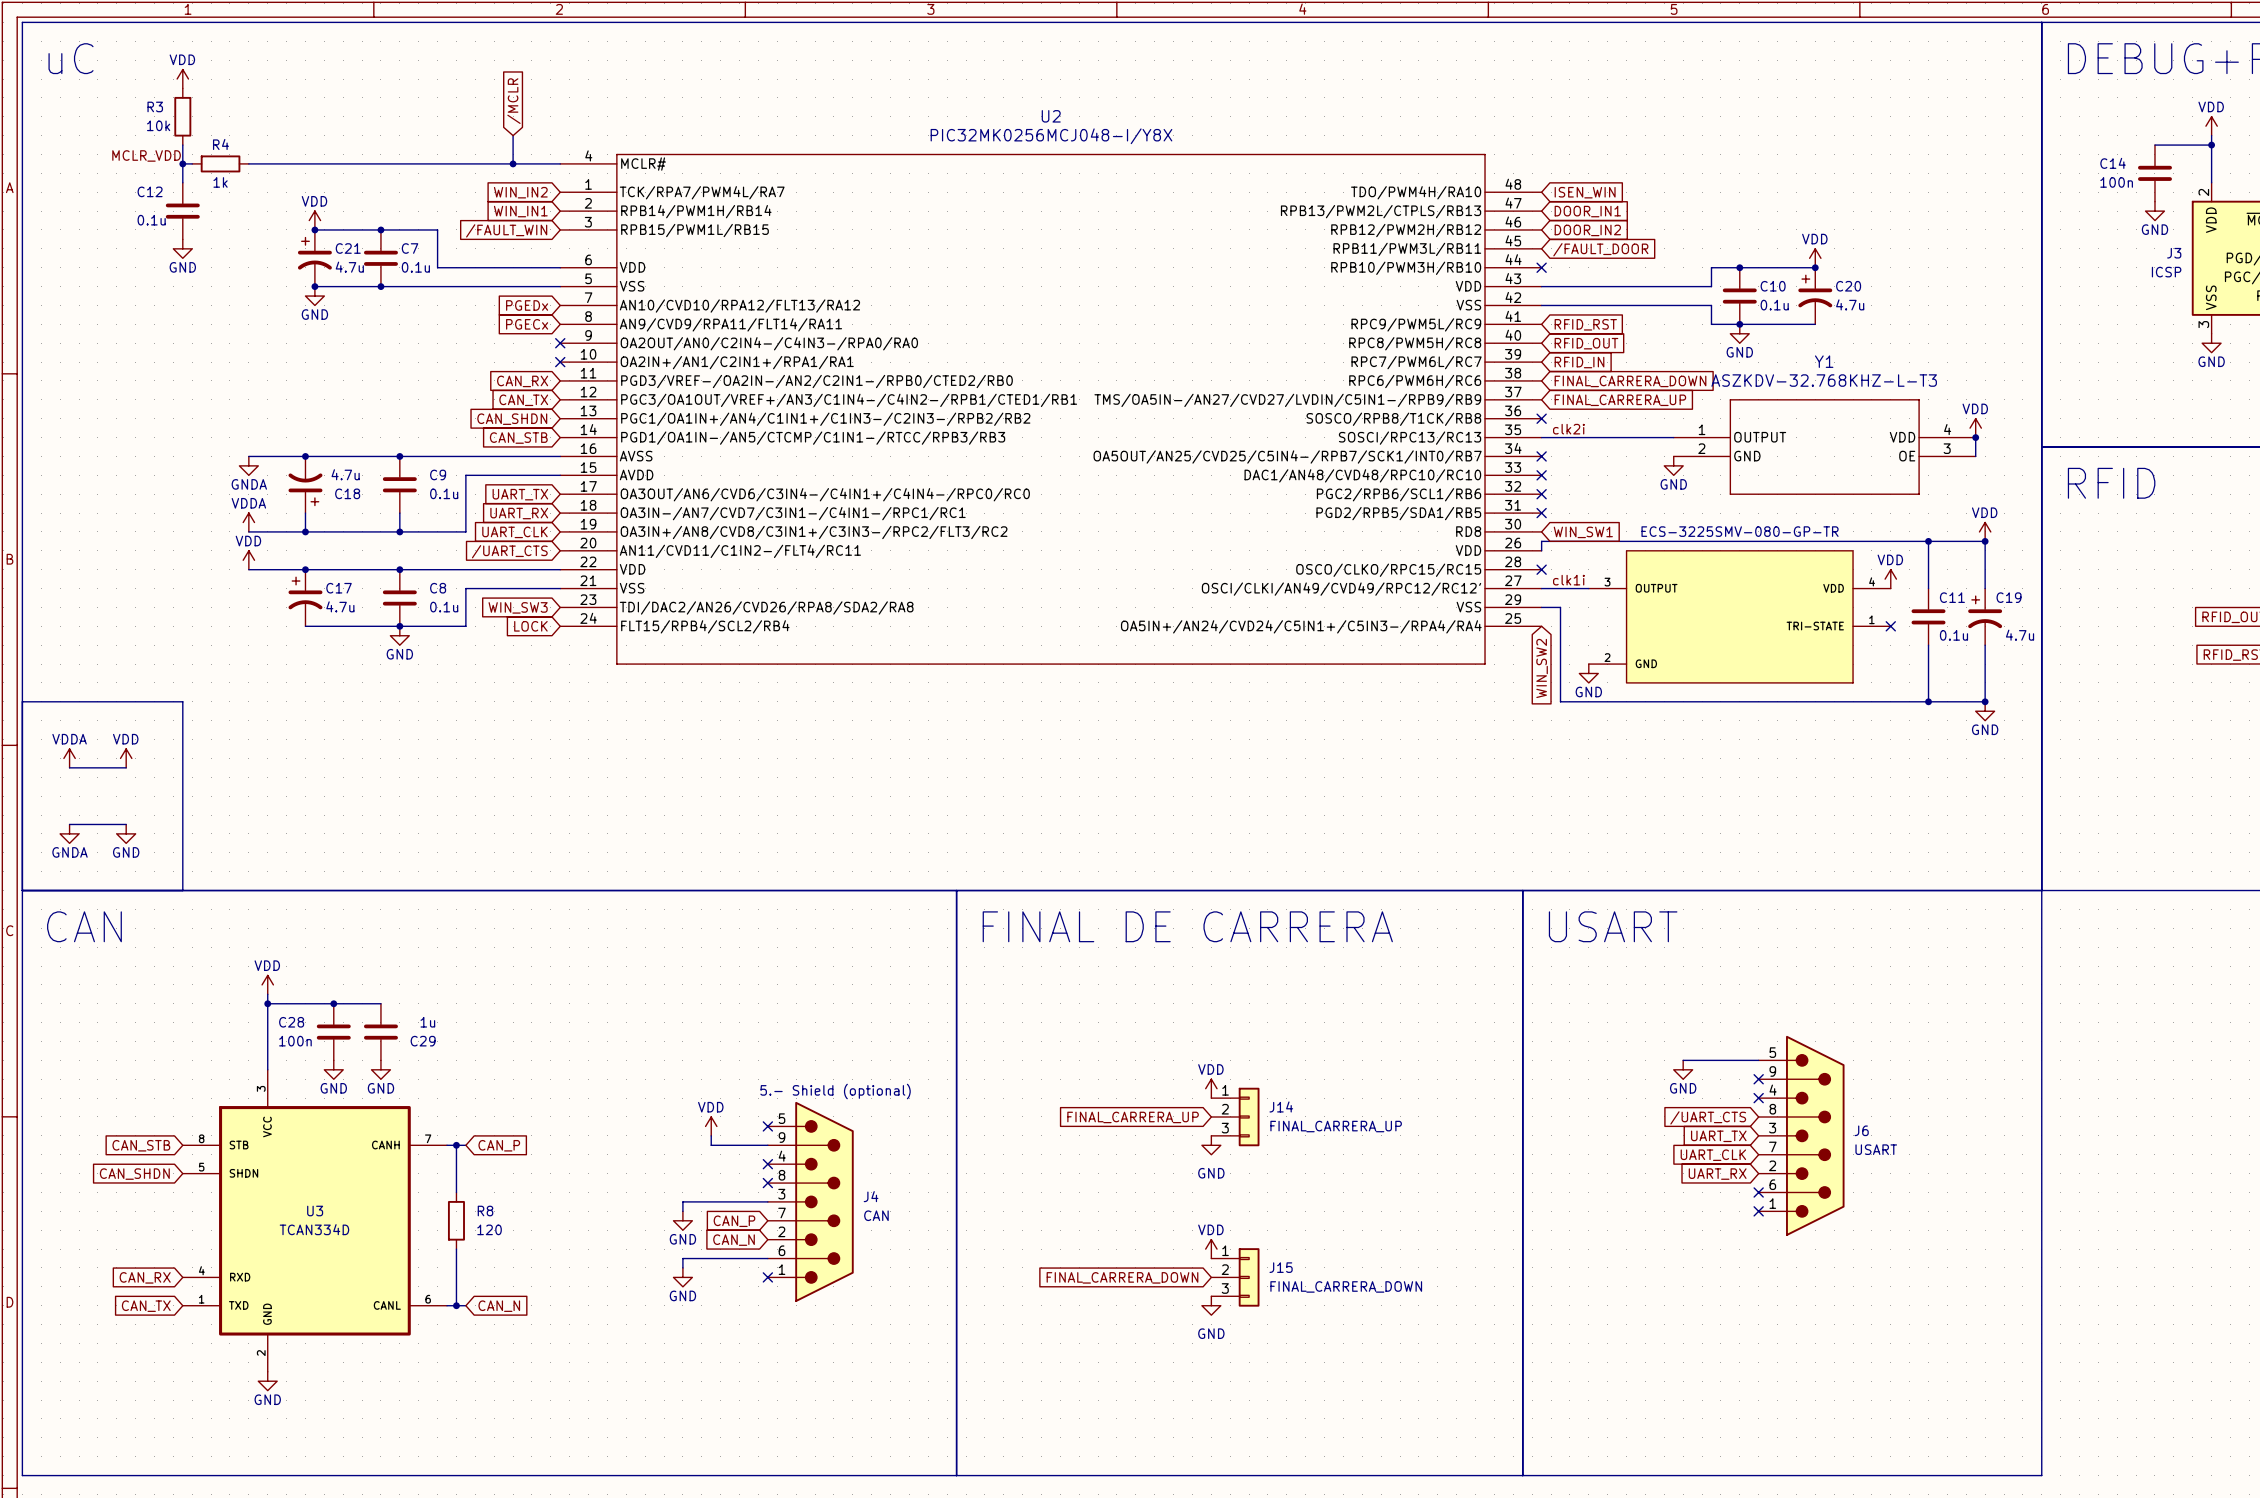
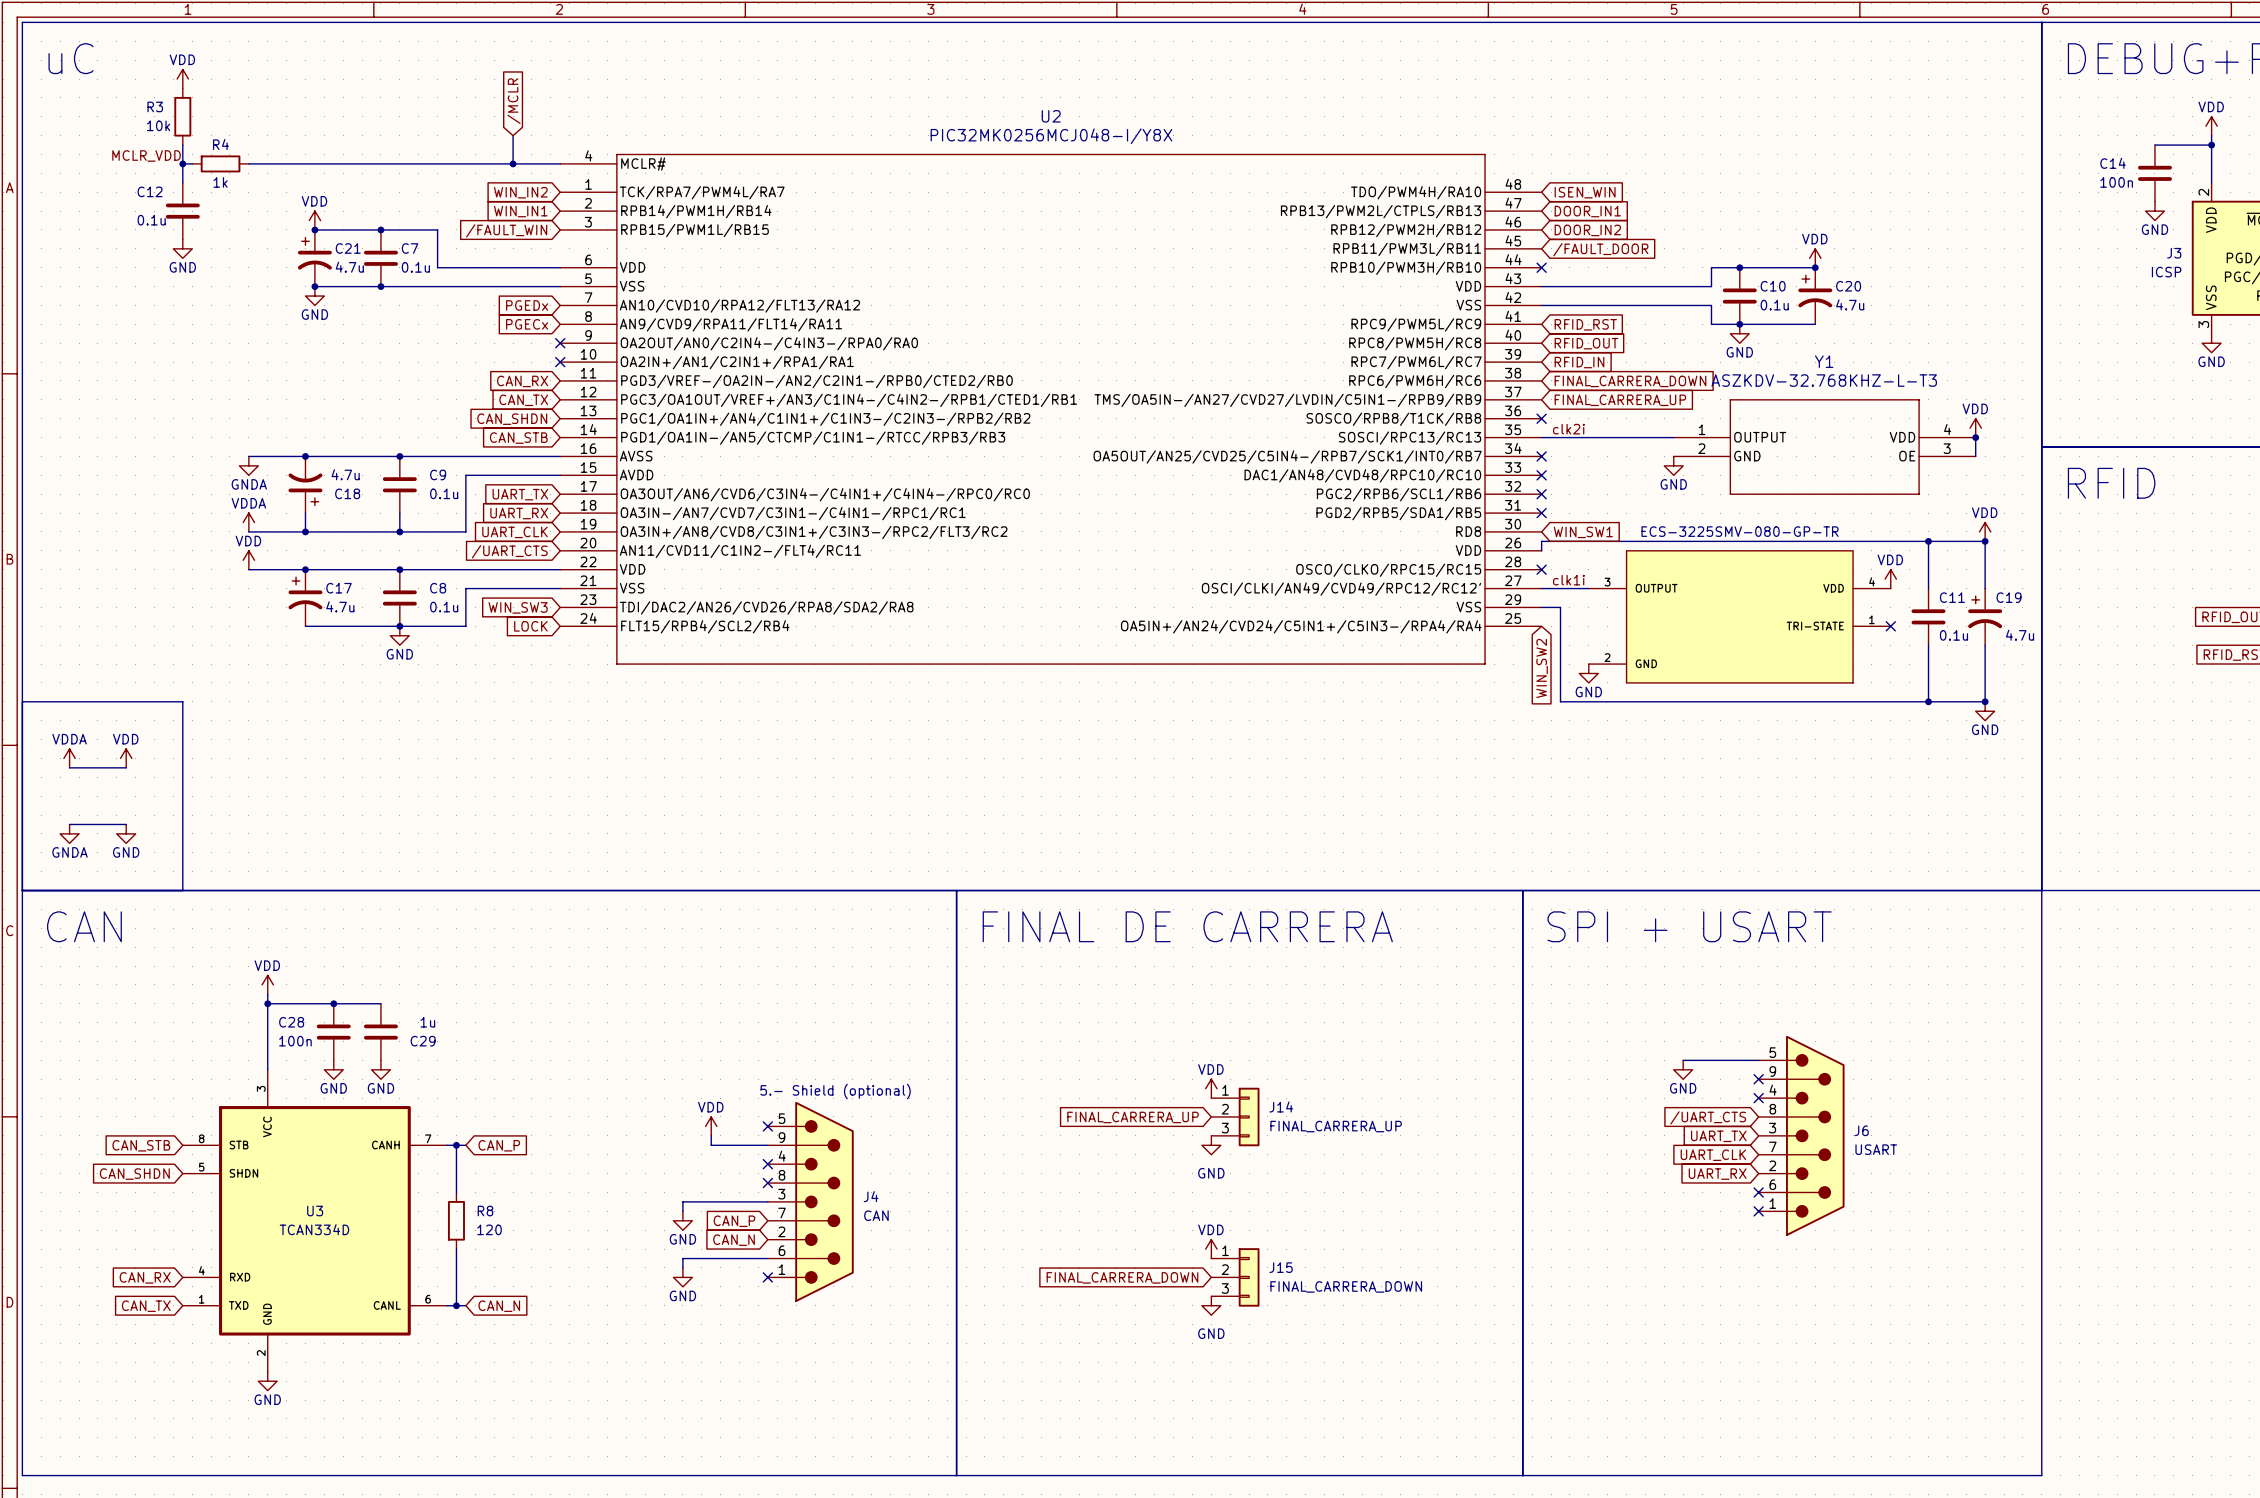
text: USART (1613, 926) -> SPI + USART (1689, 926)

